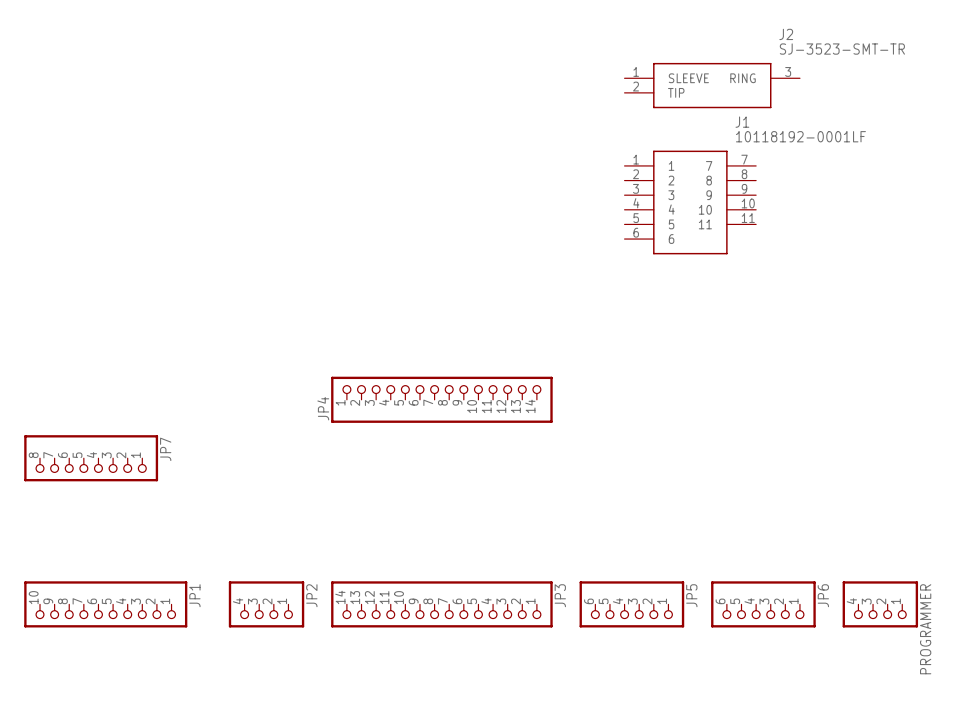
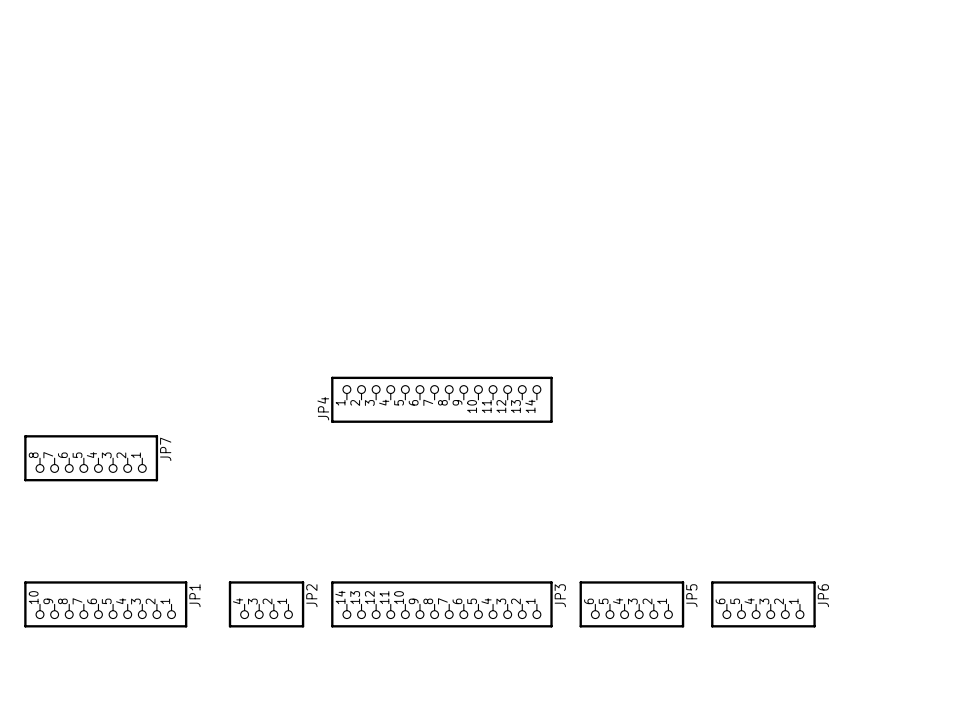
J2: SJ-3523-SMT-TR (712, 85) -> none
J1: 10118192-0001LF (690, 202) -> none
PROGRAMMER: (880, 604) -> none

